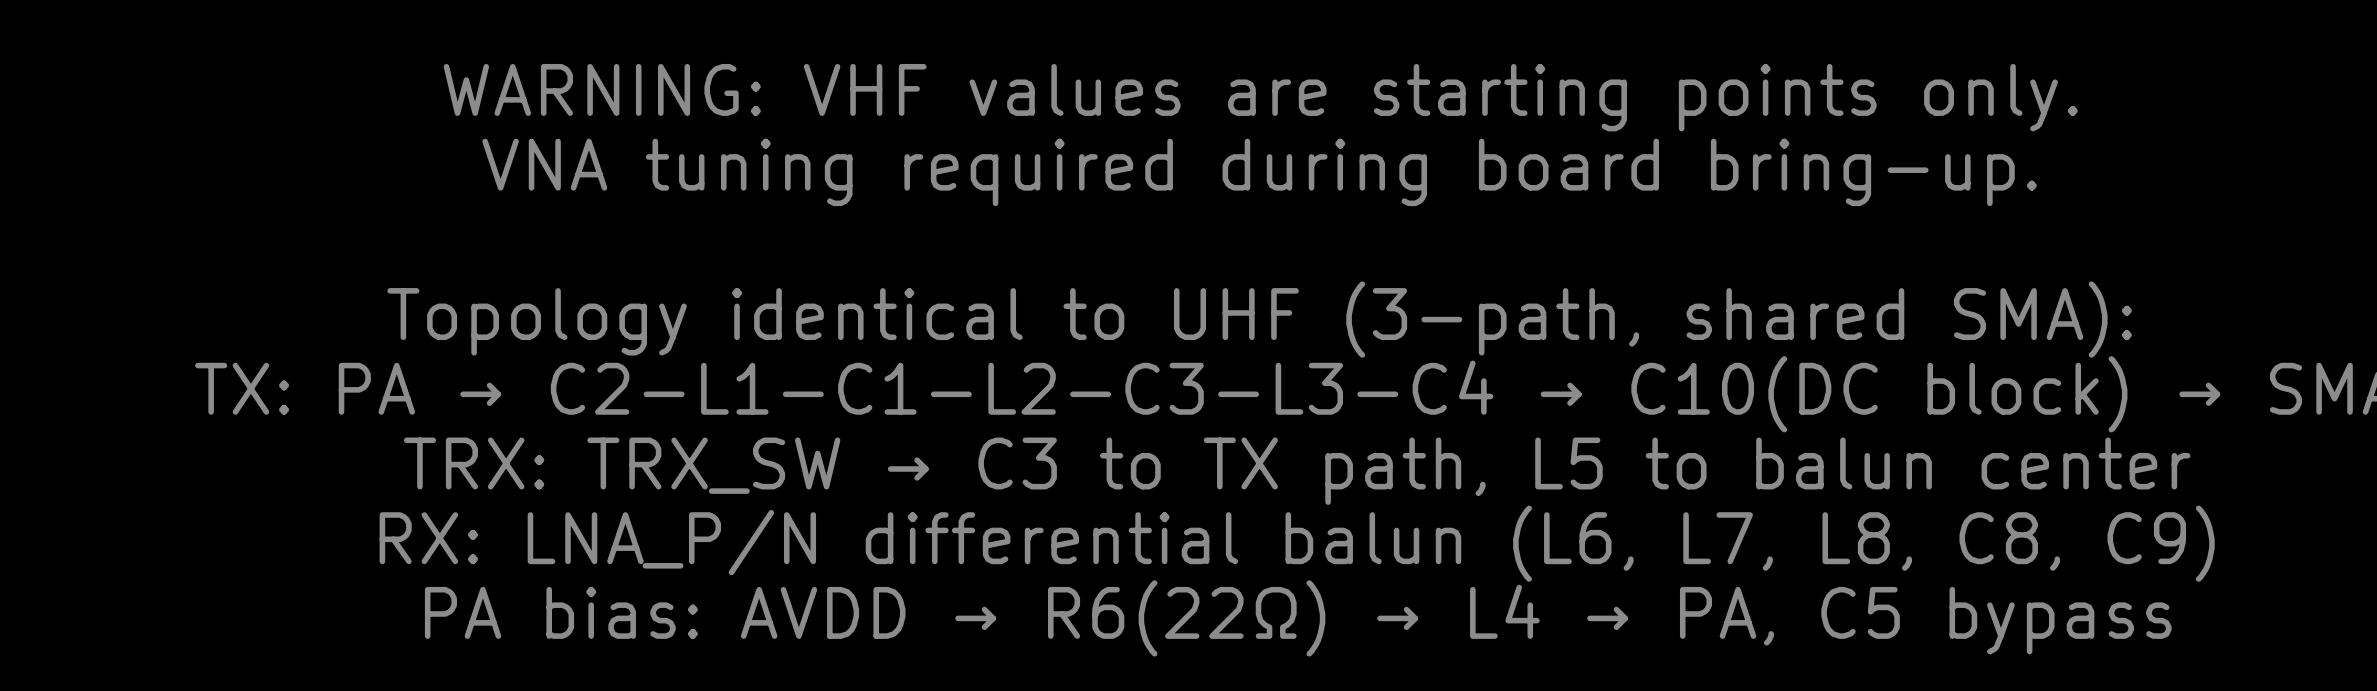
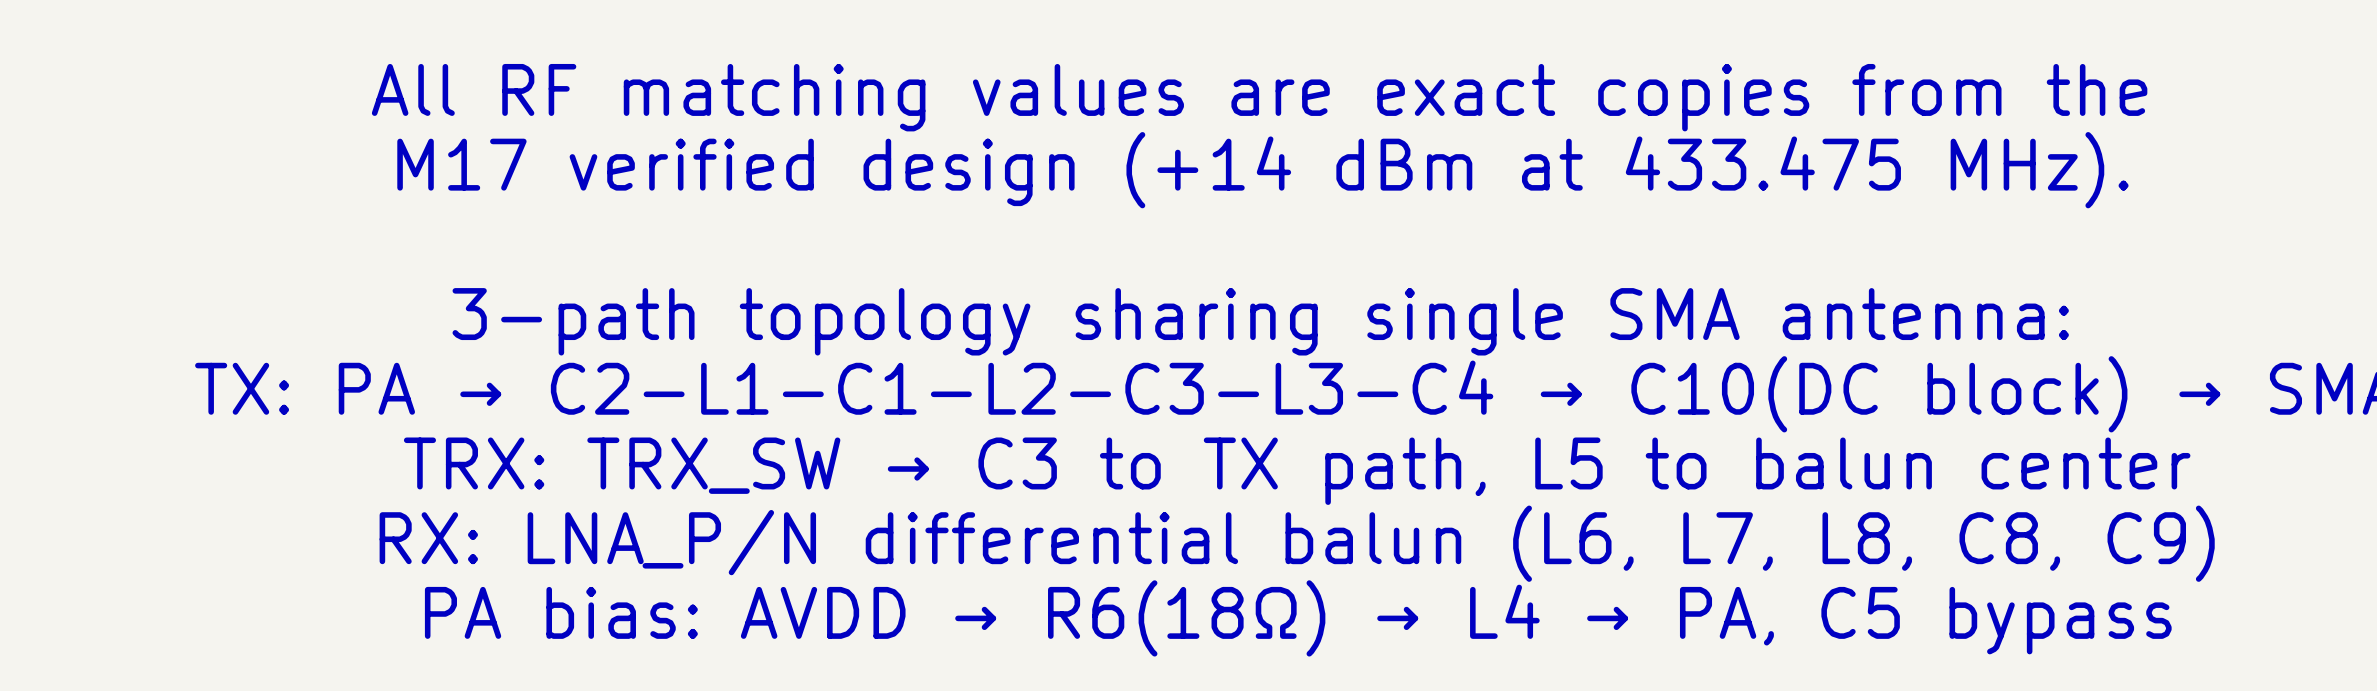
text: WARNING: VHF values are starting points only. (1260, 97) -> All RF matching values are exact copies from the (1259, 97)
text: VNA tuning required during board bring-up. (1259, 172) -> M17 verified design (+14 dBm at 433.475 MHz). (1262, 170)
text: Topology identical to UHF (3-path, shared SMA): (1259, 319) -> 3-path topology sharing single SMA antenna: (1260, 321)
text: PA bias: AVDD → R6(22Ω) → L4 → PA, C5 bypass (1298, 618) -> PA bias: AVDD → R6(18Ω) → L4 → PA, C5 bypass (1298, 618)

